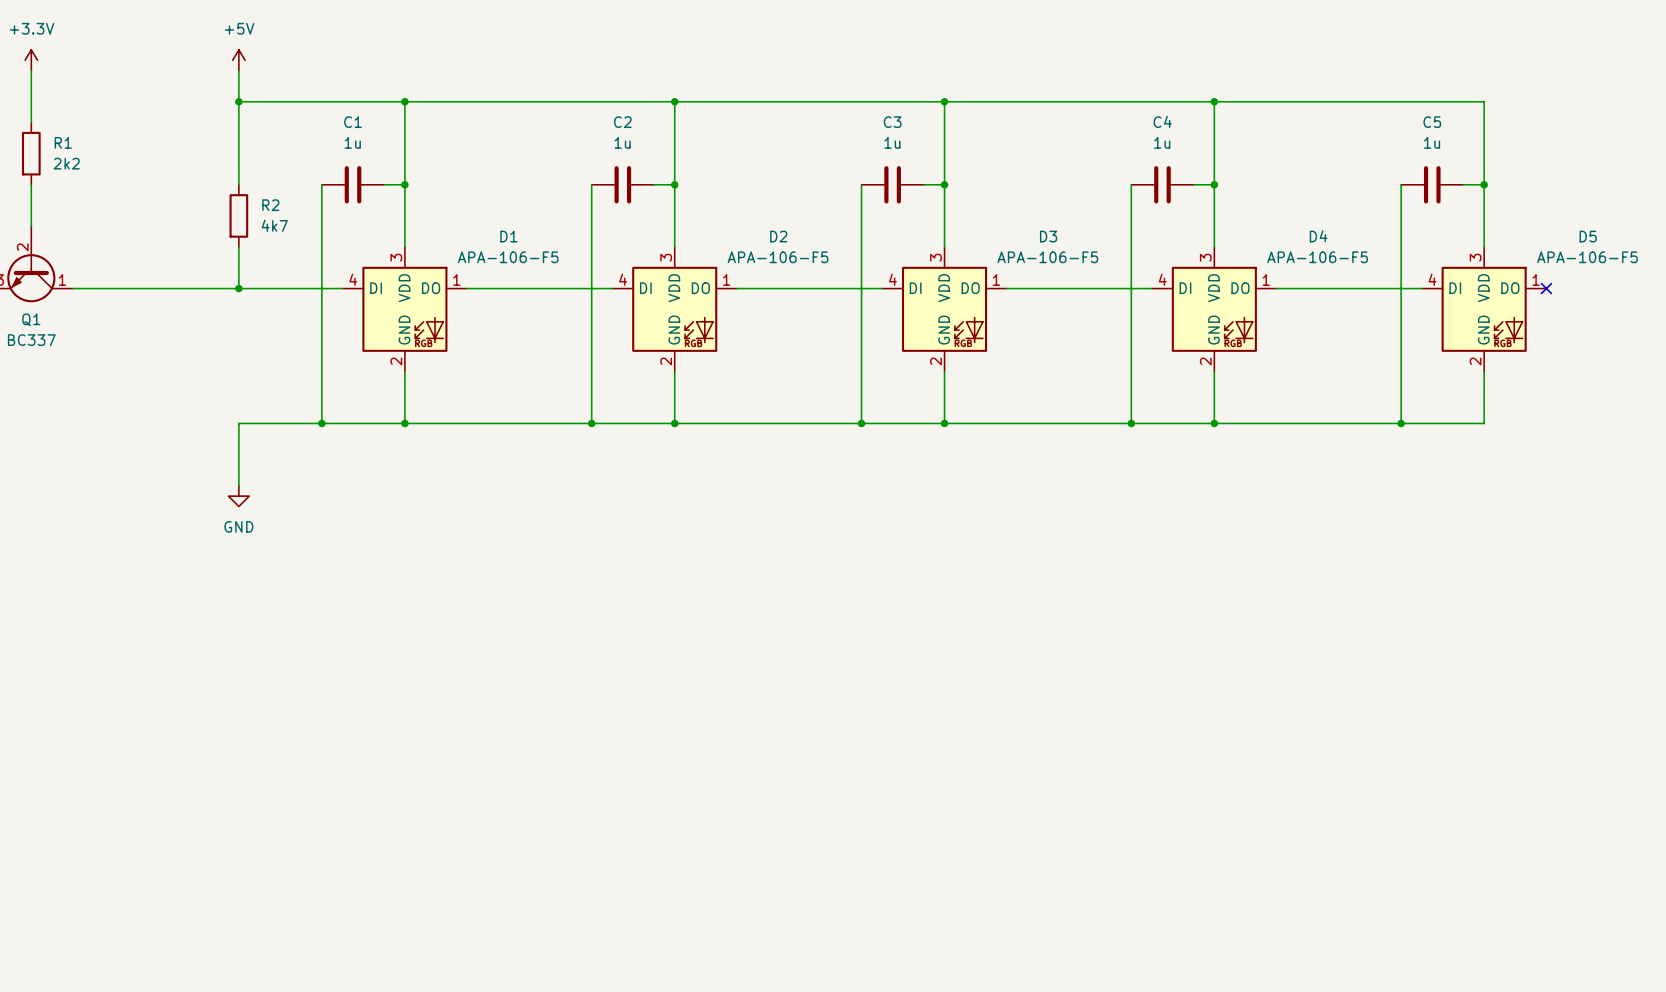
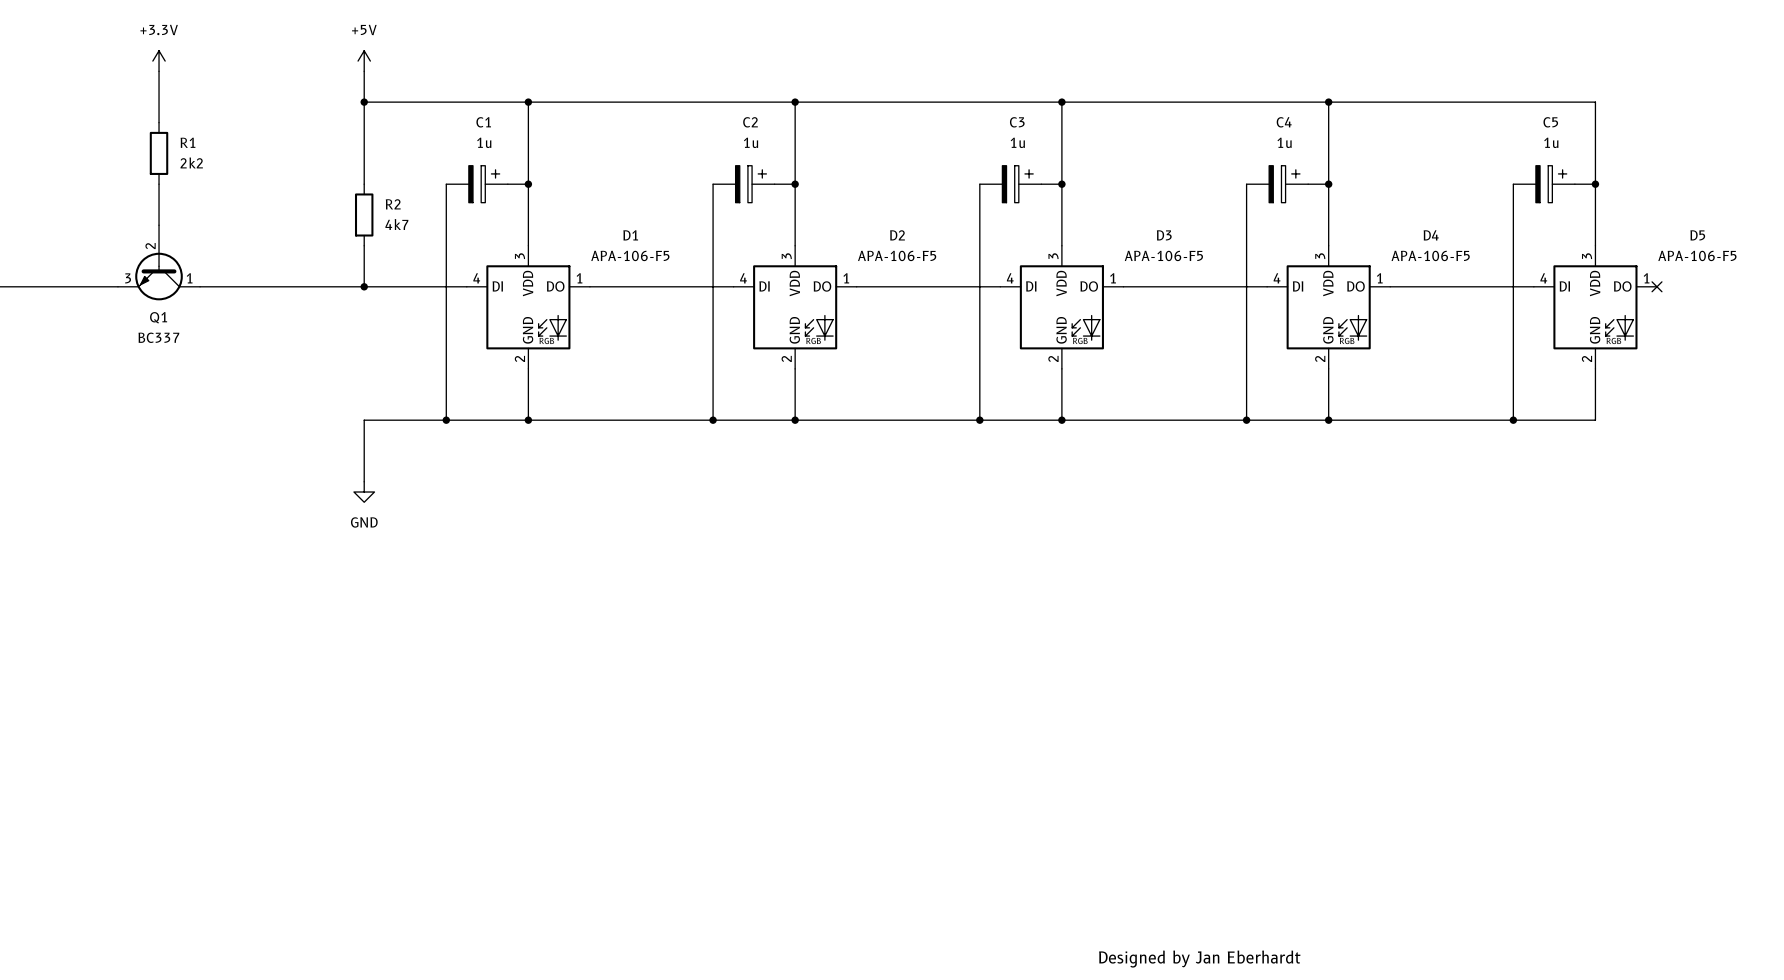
C1 symbol: [321, 166, 385, 204] -> [446, 165, 508, 203]
C2 symbol: [591, 166, 654, 204] -> [713, 165, 775, 203]
C3 symbol: [861, 166, 924, 204] -> [979, 165, 1042, 203]
C4 symbol: [1131, 166, 1194, 204] -> [1246, 165, 1309, 203]
C5 symbol: [1401, 166, 1464, 204] -> [1513, 165, 1575, 203]
text: none -> Designed by Jan Eberhardt (1199, 959)

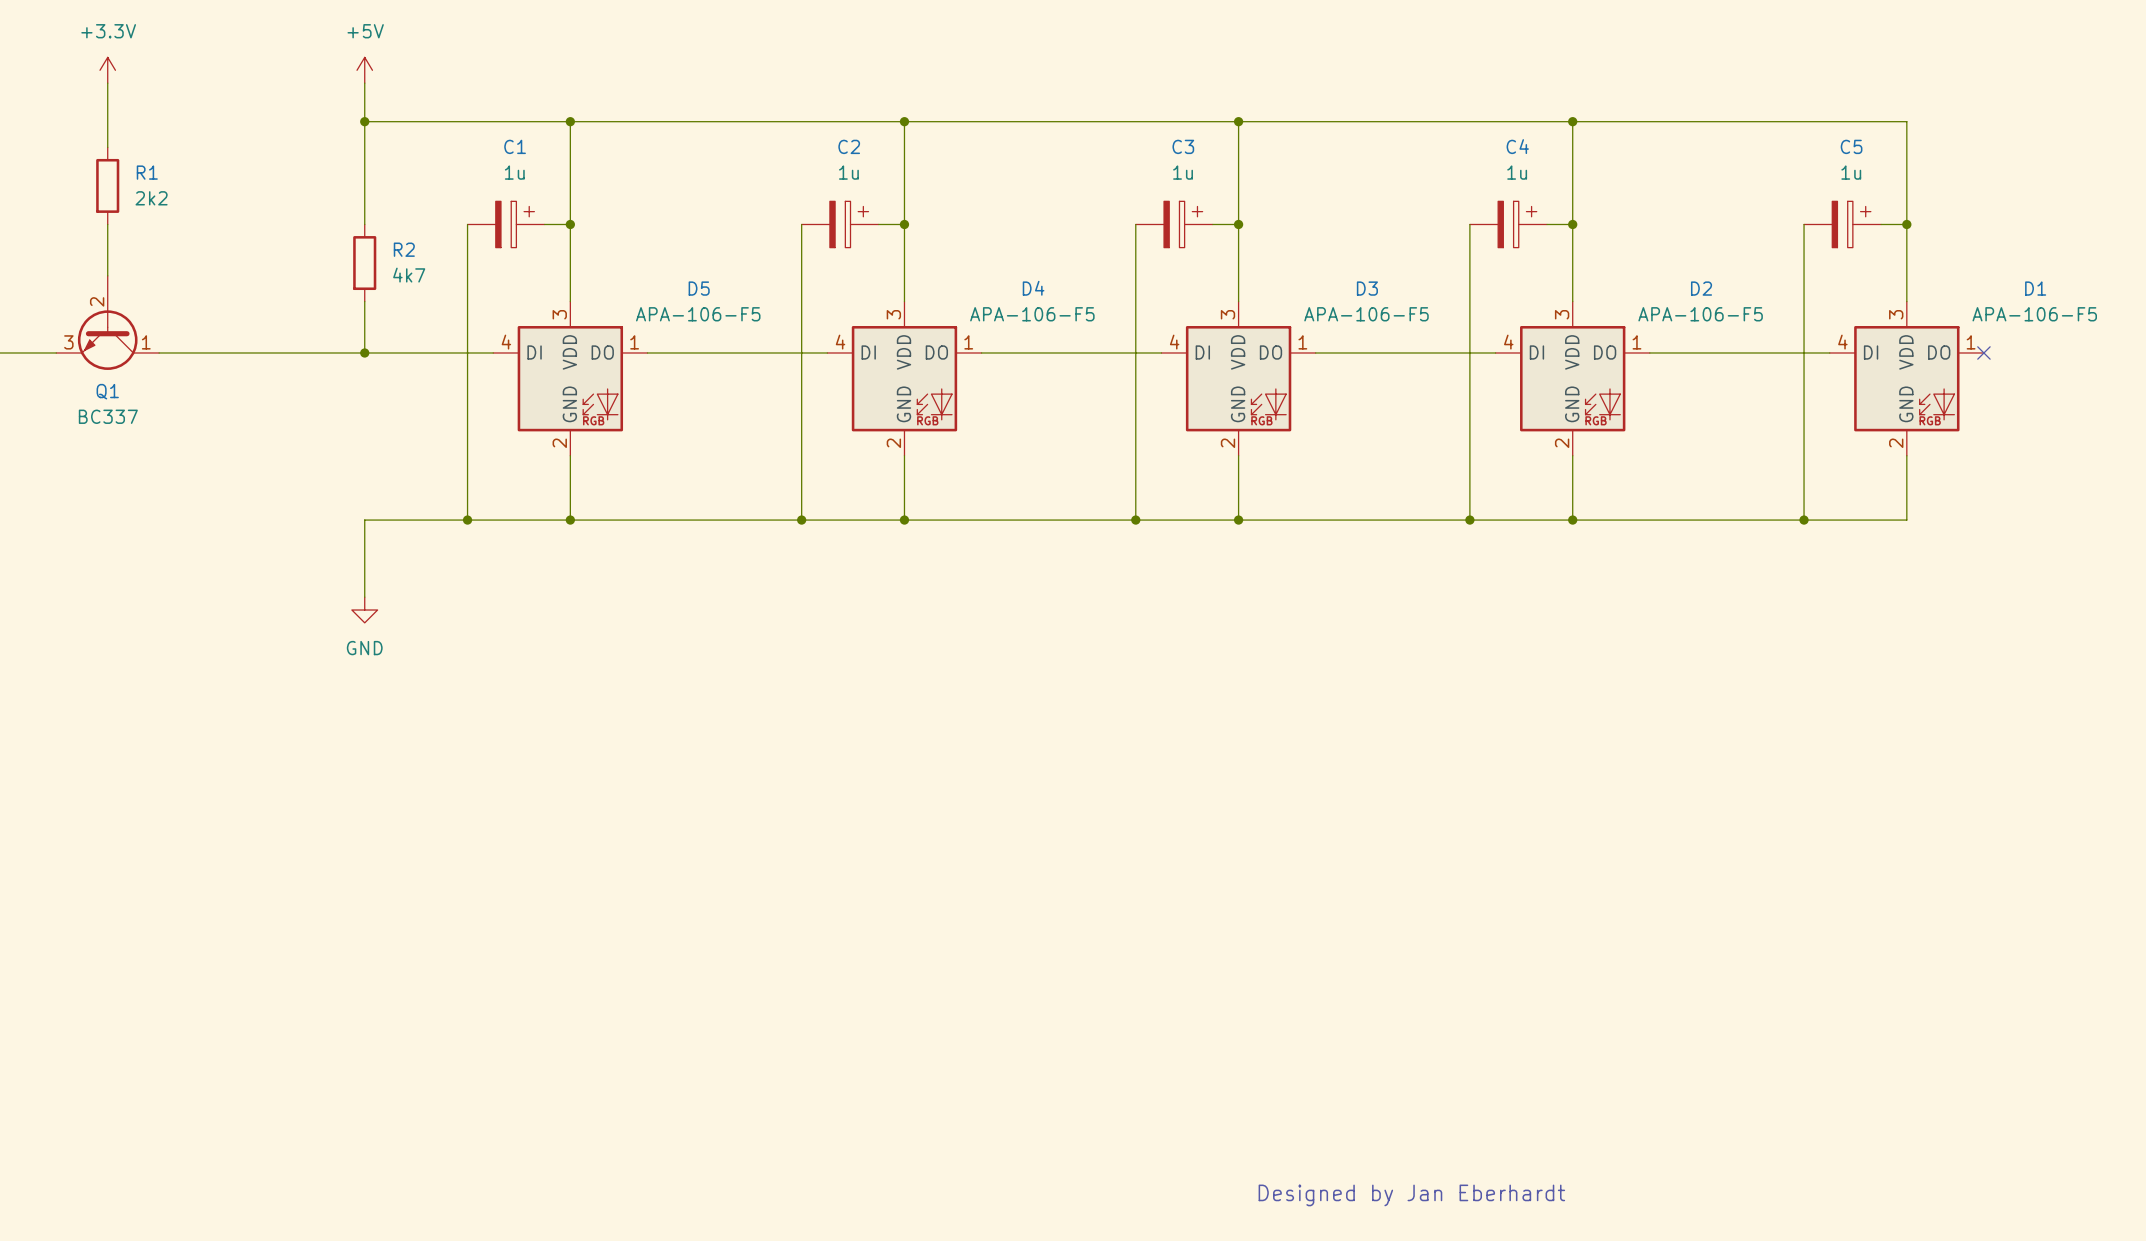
D1 name: D1 (630, 235) -> D5 (699, 288)
D2 name: D2 (897, 235) -> D4 (1033, 288)
D4 name: D4 (1431, 235) -> D2 (1701, 288)
D5 name: D5 (1697, 235) -> D1 (2035, 288)

